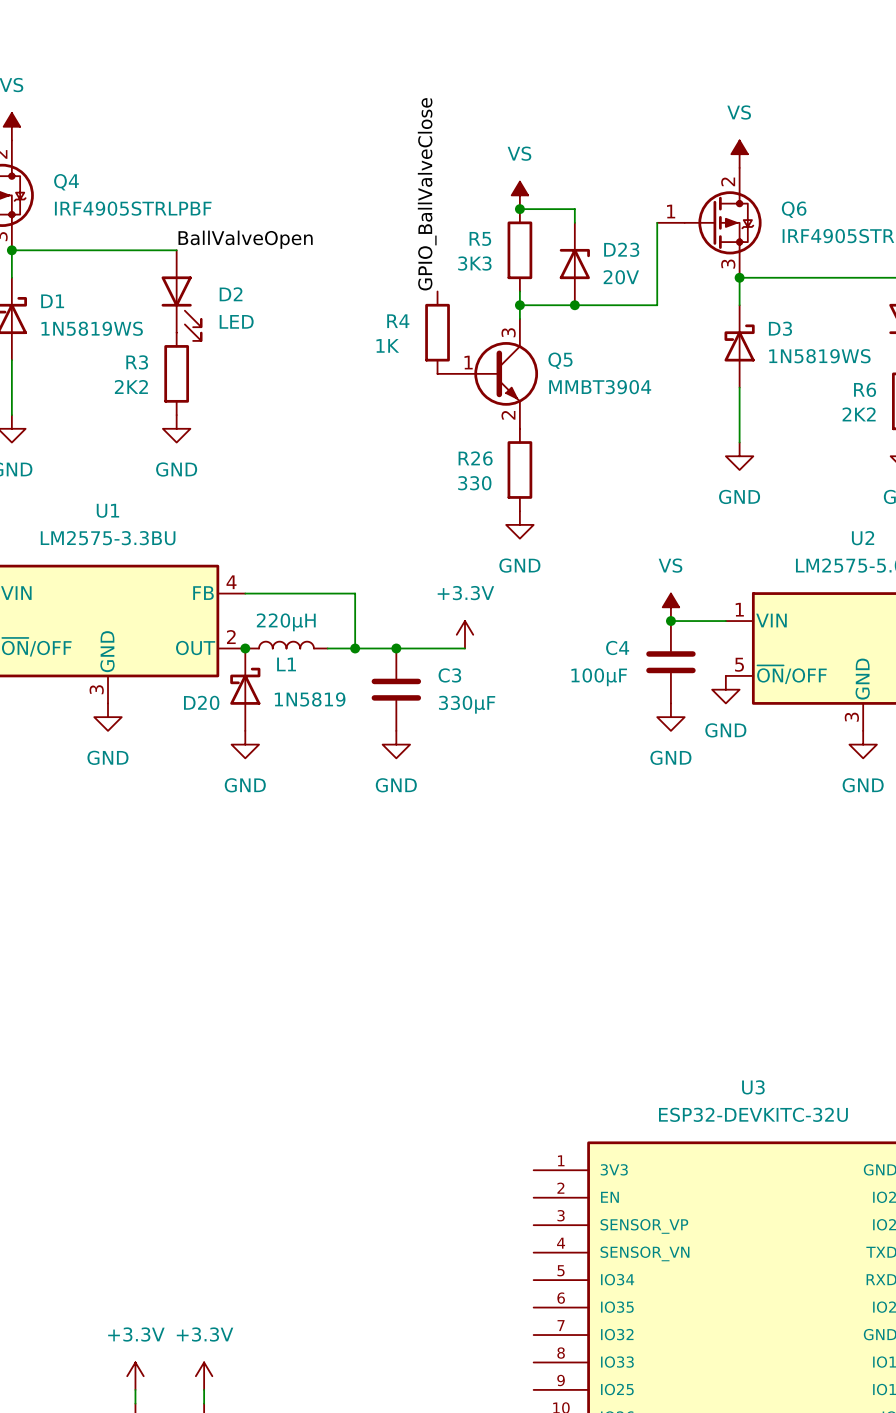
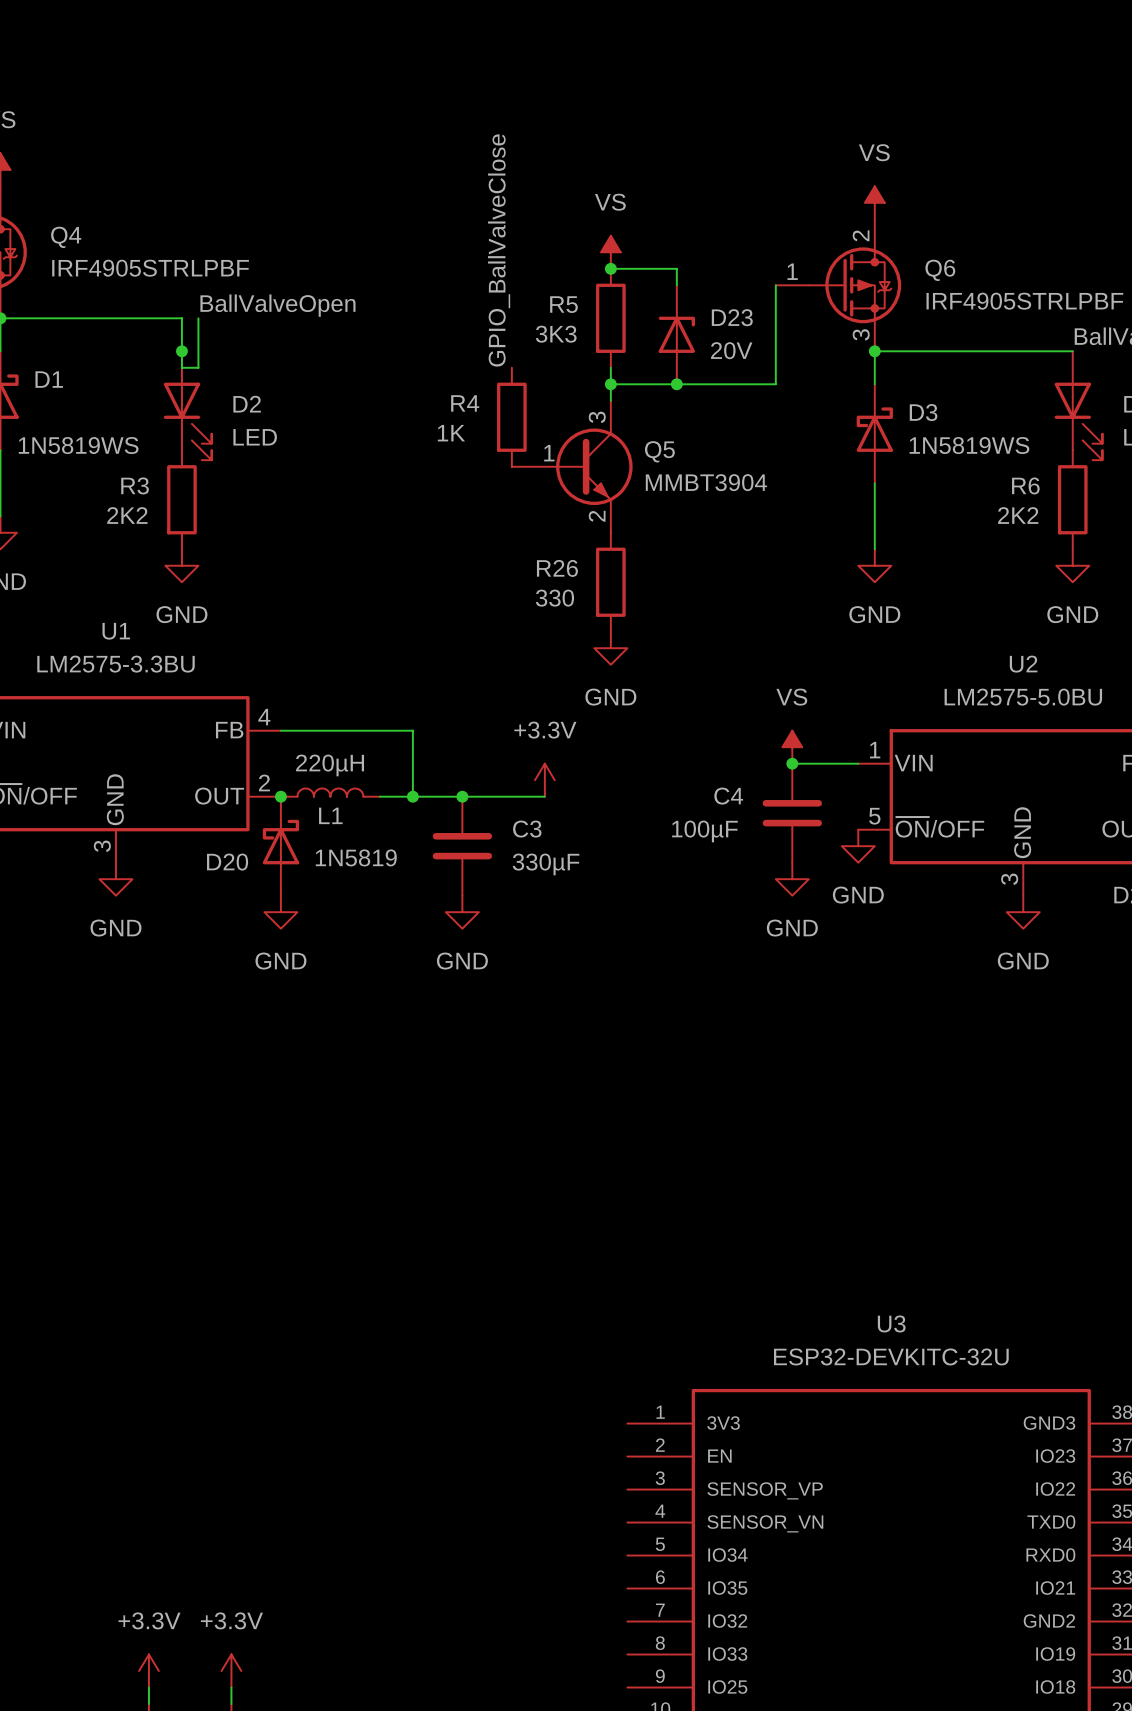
wire: (162, 250) (176, 250) -> (181, 318) (181, 367) (198, 367) (198, 318)
junction: none -> (181, 351)
D2 position: (181, 295) -> (187, 405)
D1 value position: 1N5819WS (92, 328) -> 1N5819WS (78, 445)
R3 position: (176, 373) -> (181, 499)
power symbol position: GND (176, 428) -> GND (181, 565)

